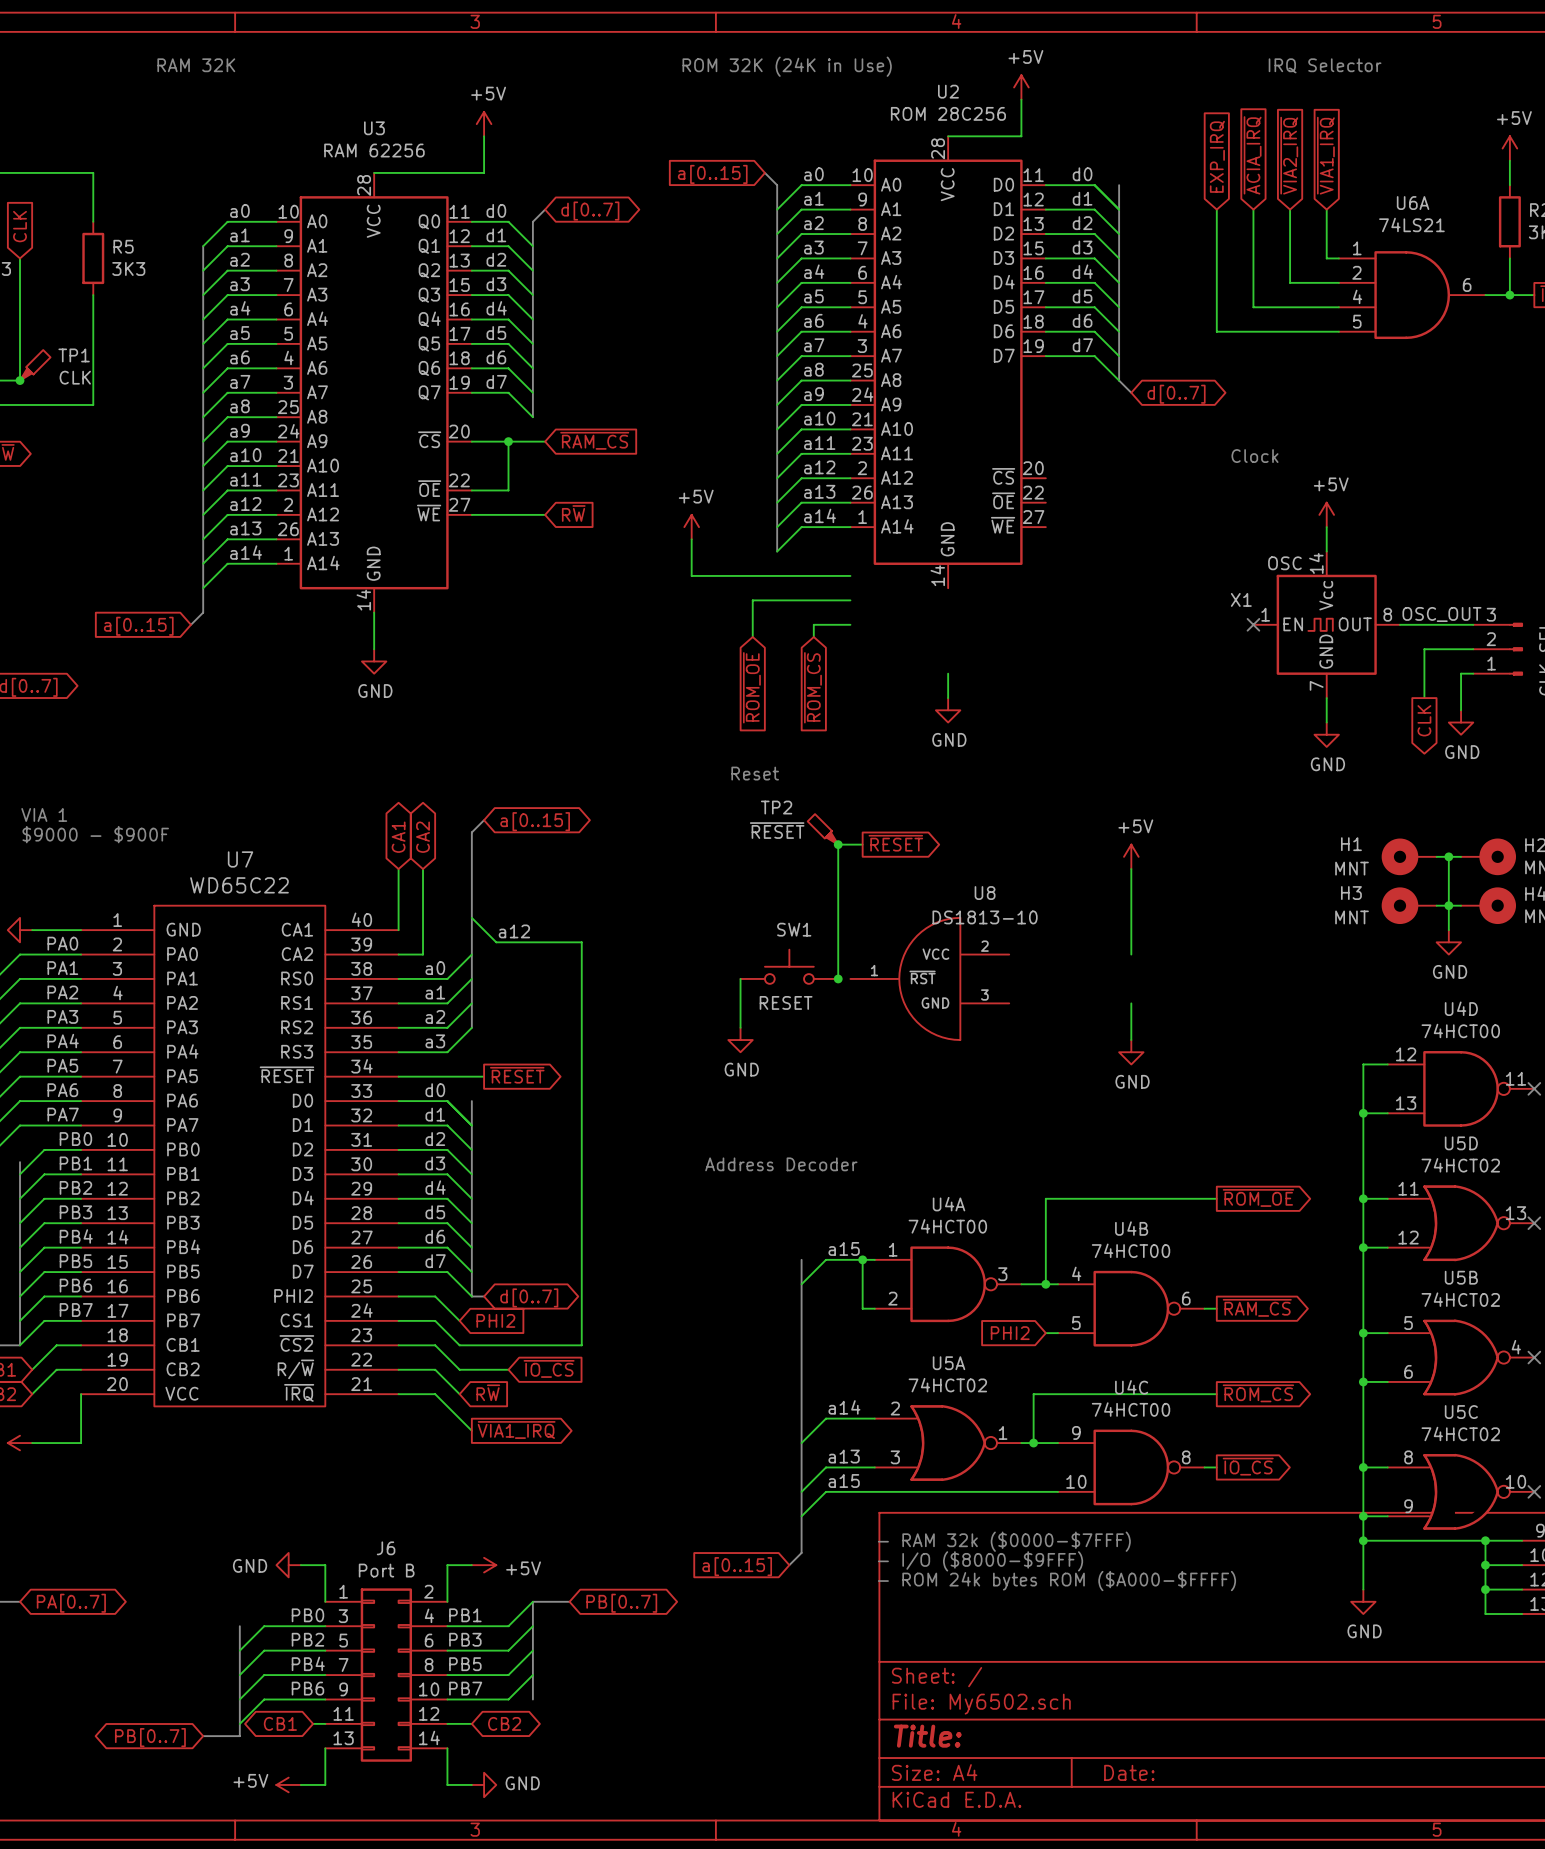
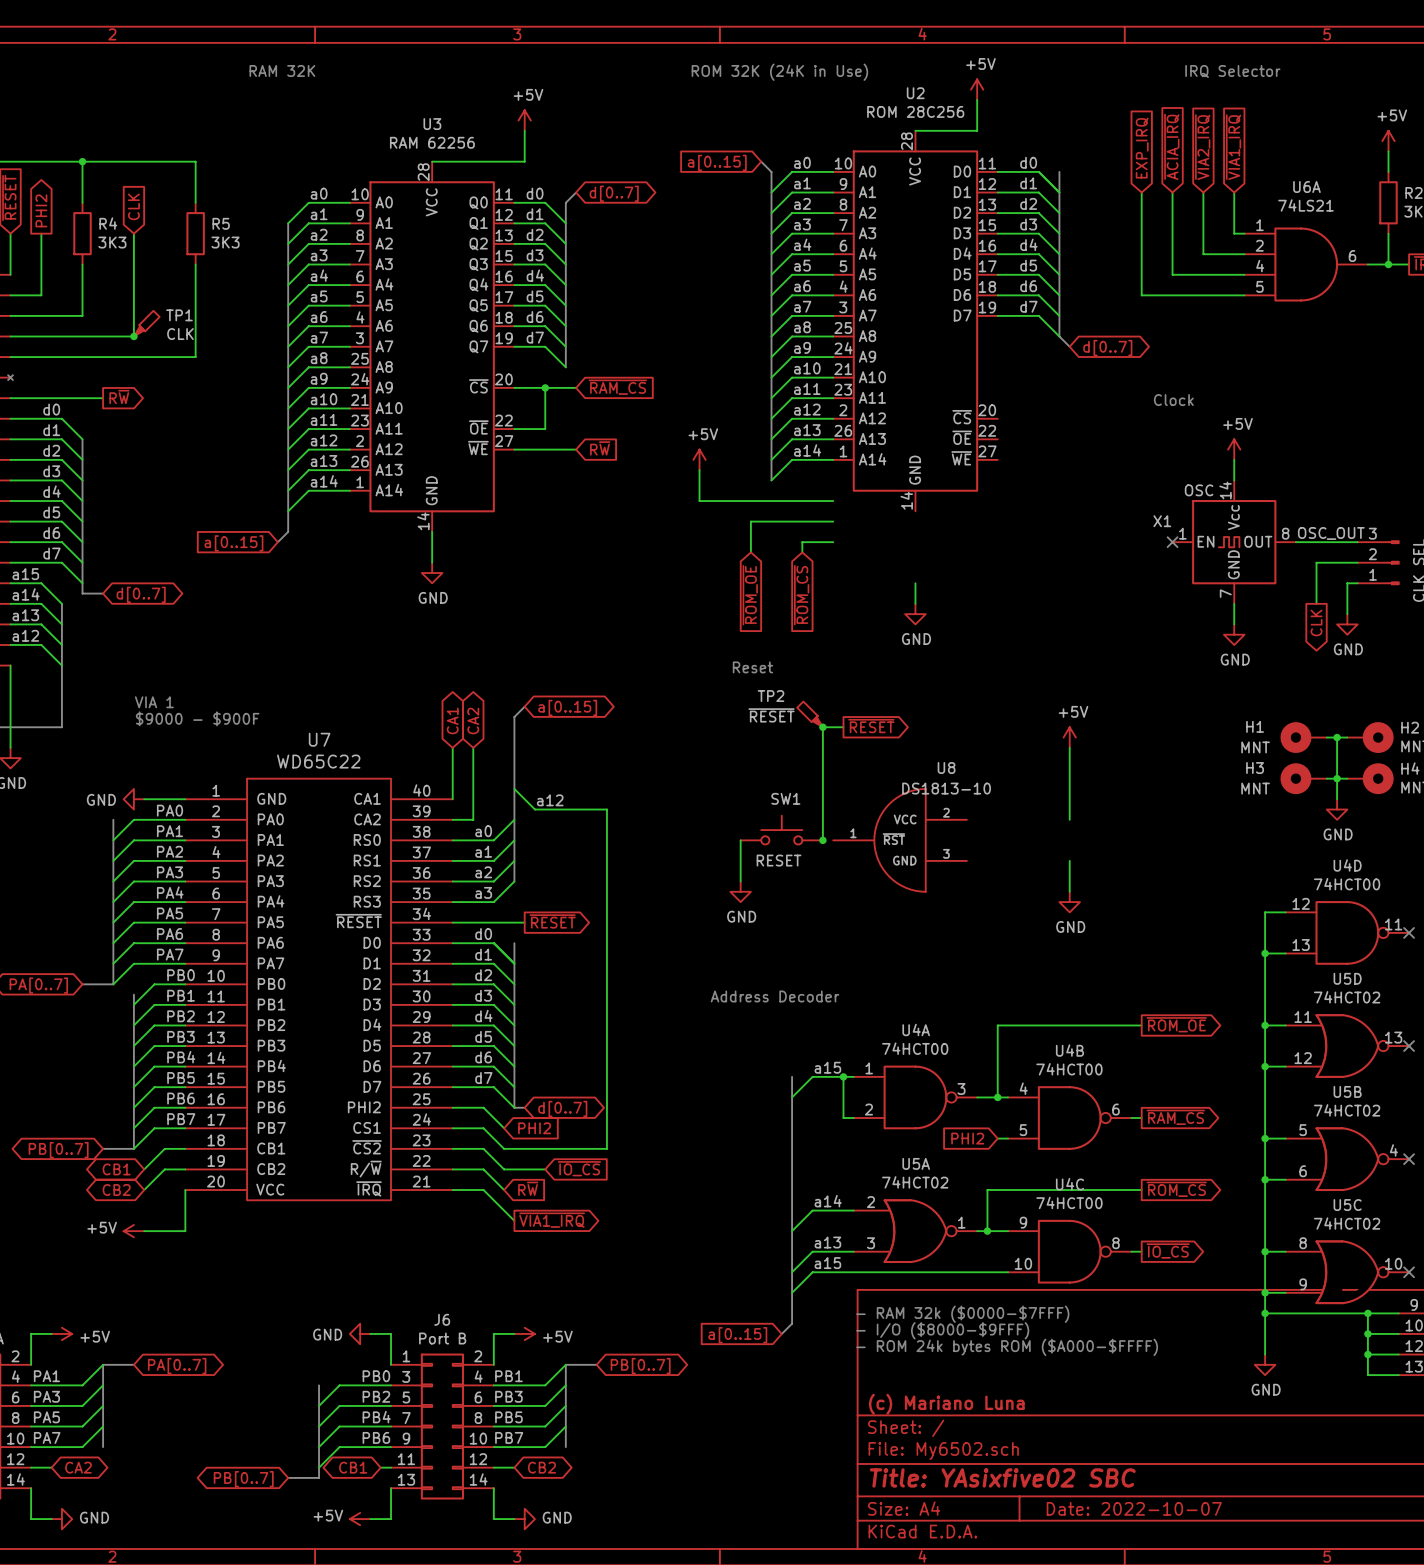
title block: none -> (c) Mariano Luna (946, 1404)
title block: Title: (927, 1736) -> Title: YAsixfive02 SBC (1002, 1477)
title block: Date: (1129, 1772) -> Date: 2022-10-07 (1134, 1508)

